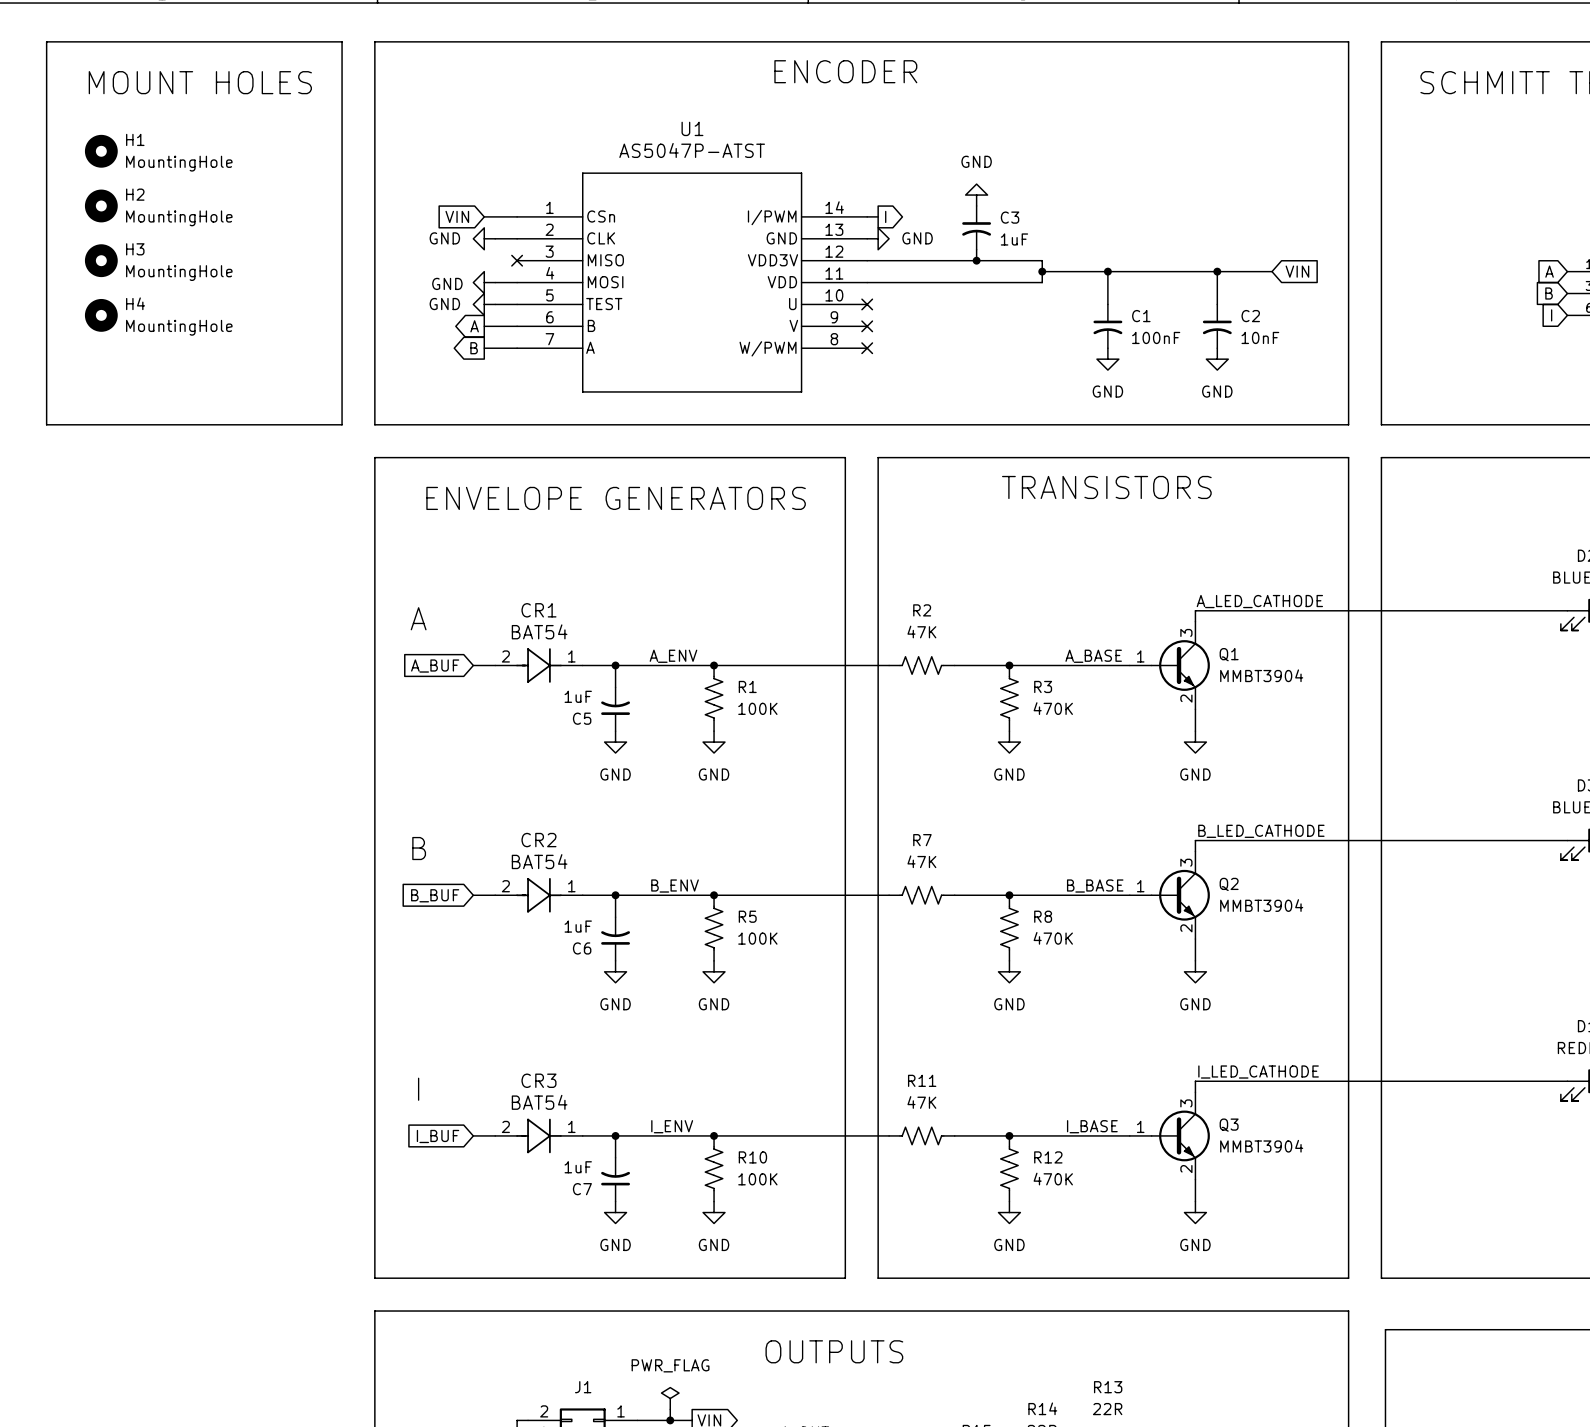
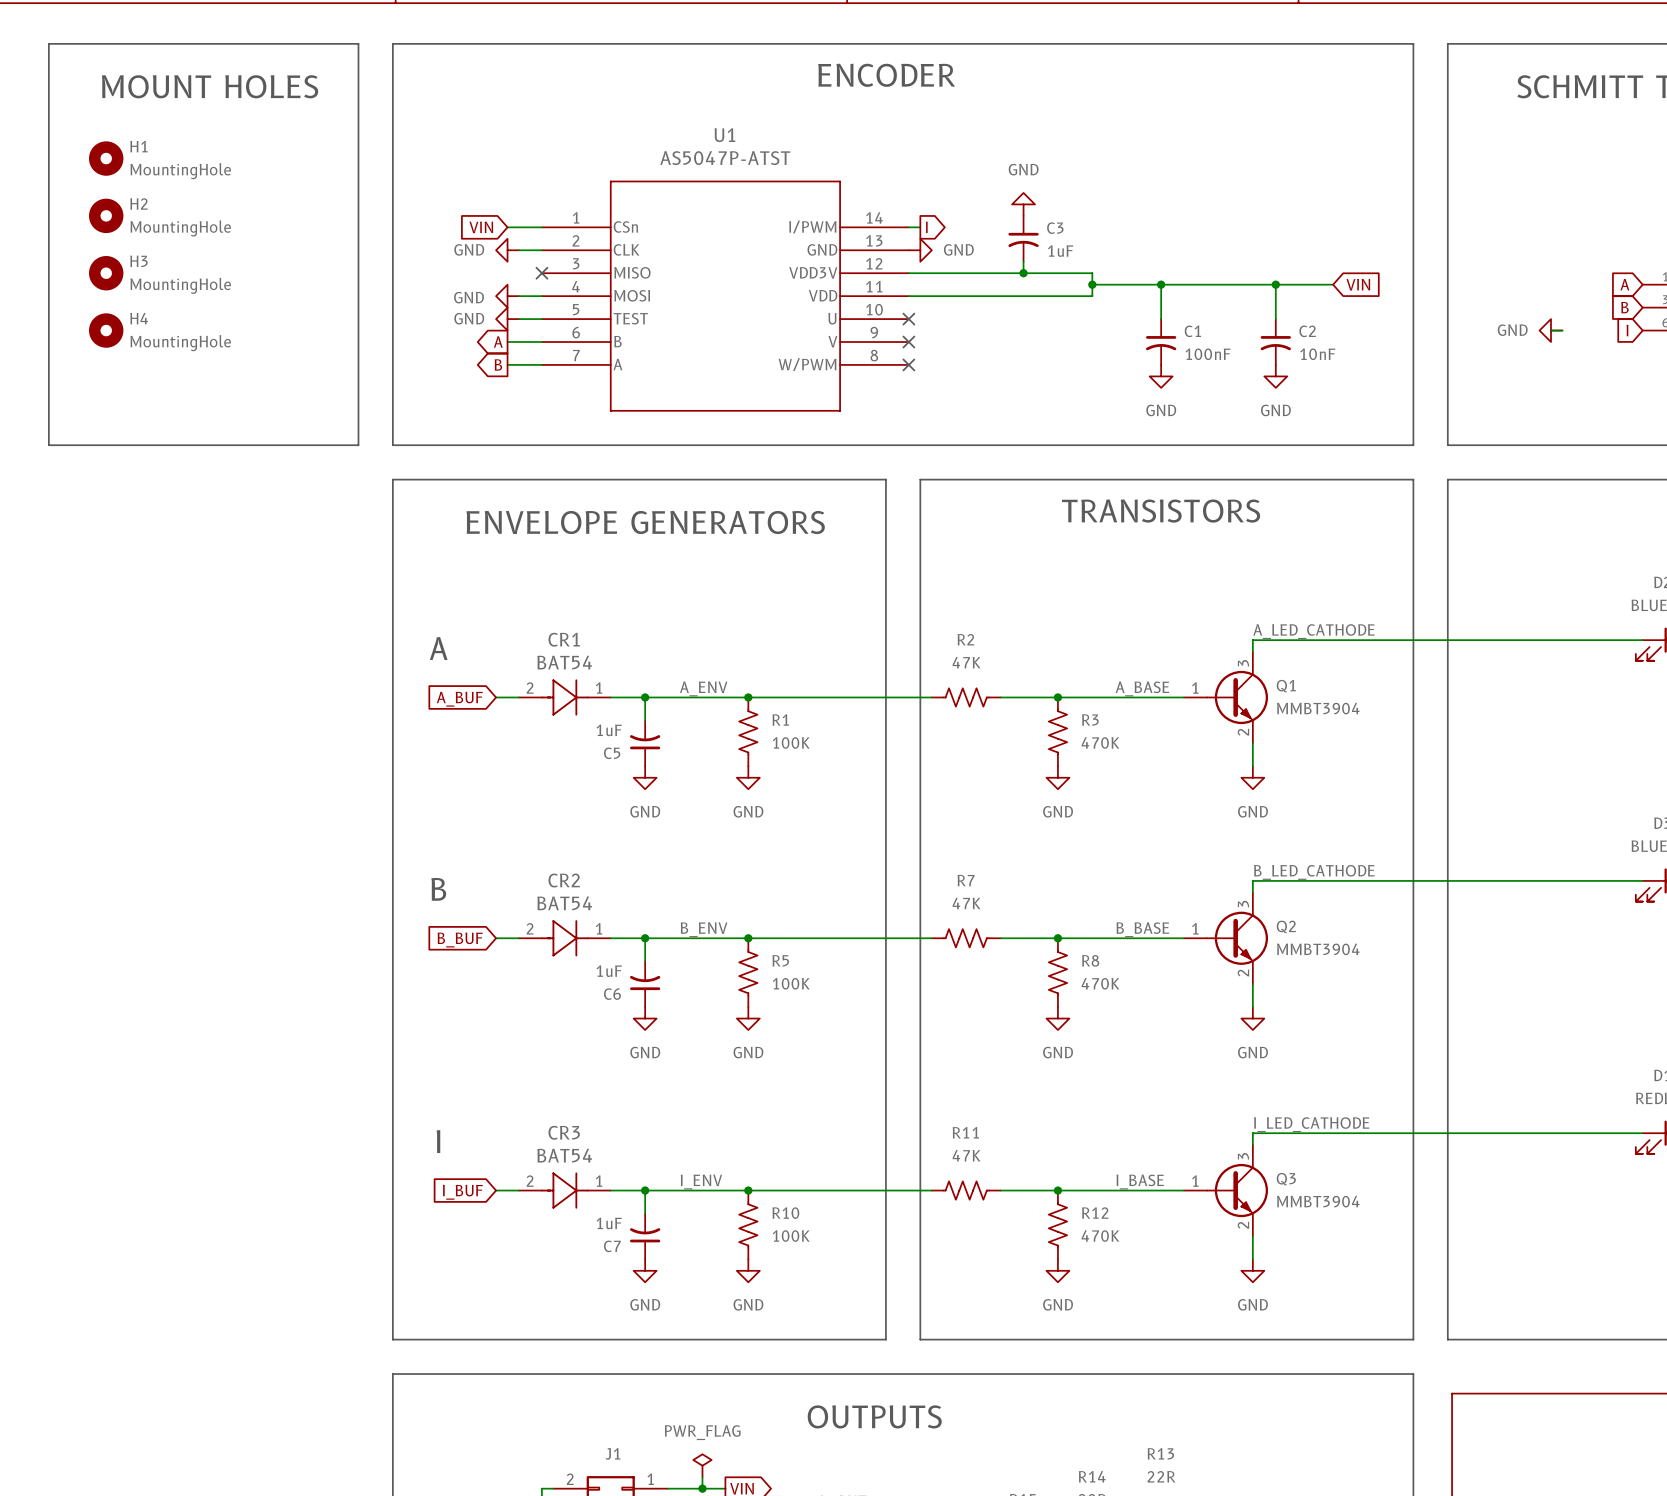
wire: none -> (1551, 330) (1562, 330)
power symbol: none -> GND (1551, 330)

